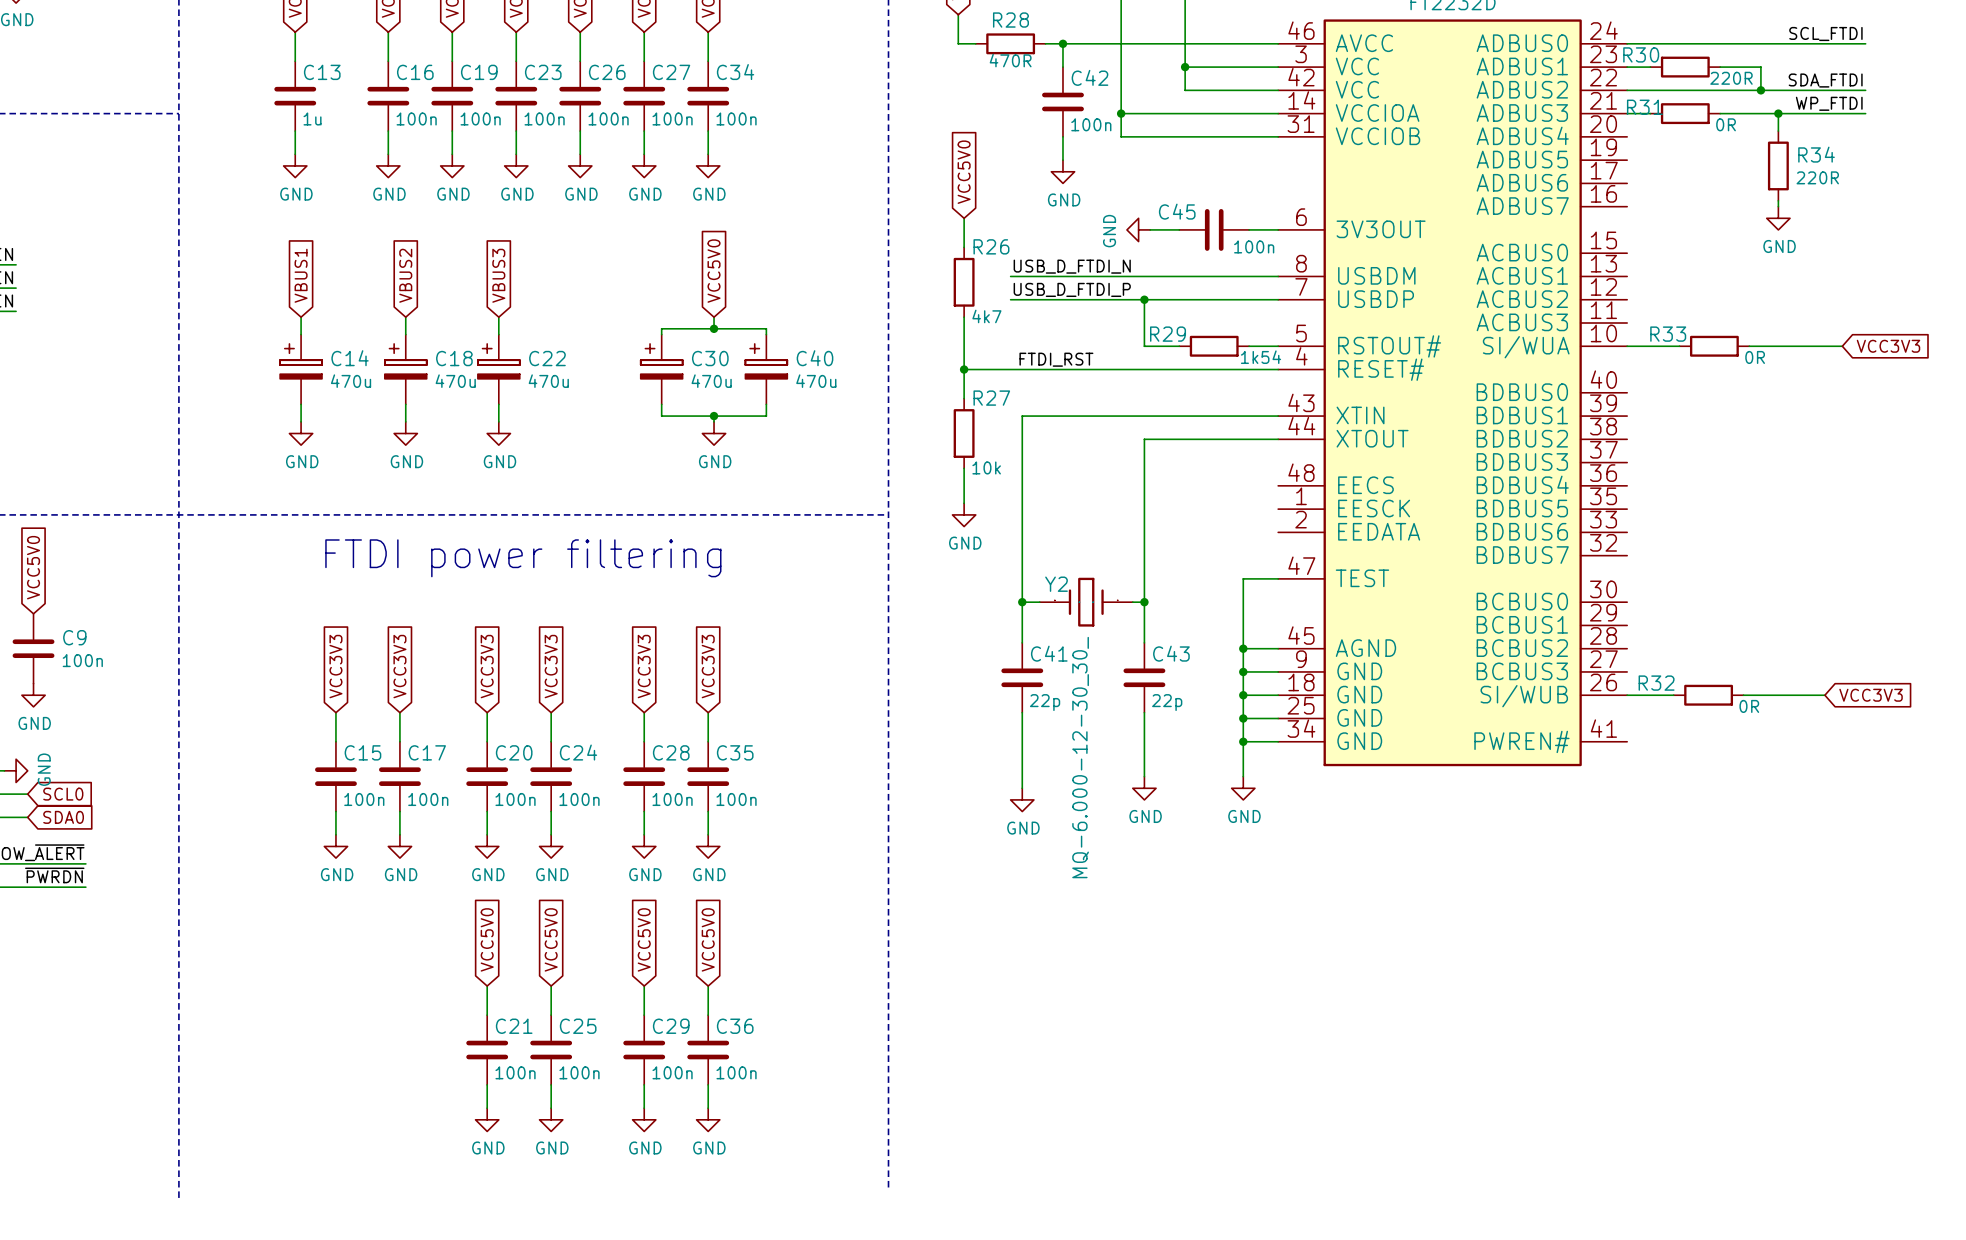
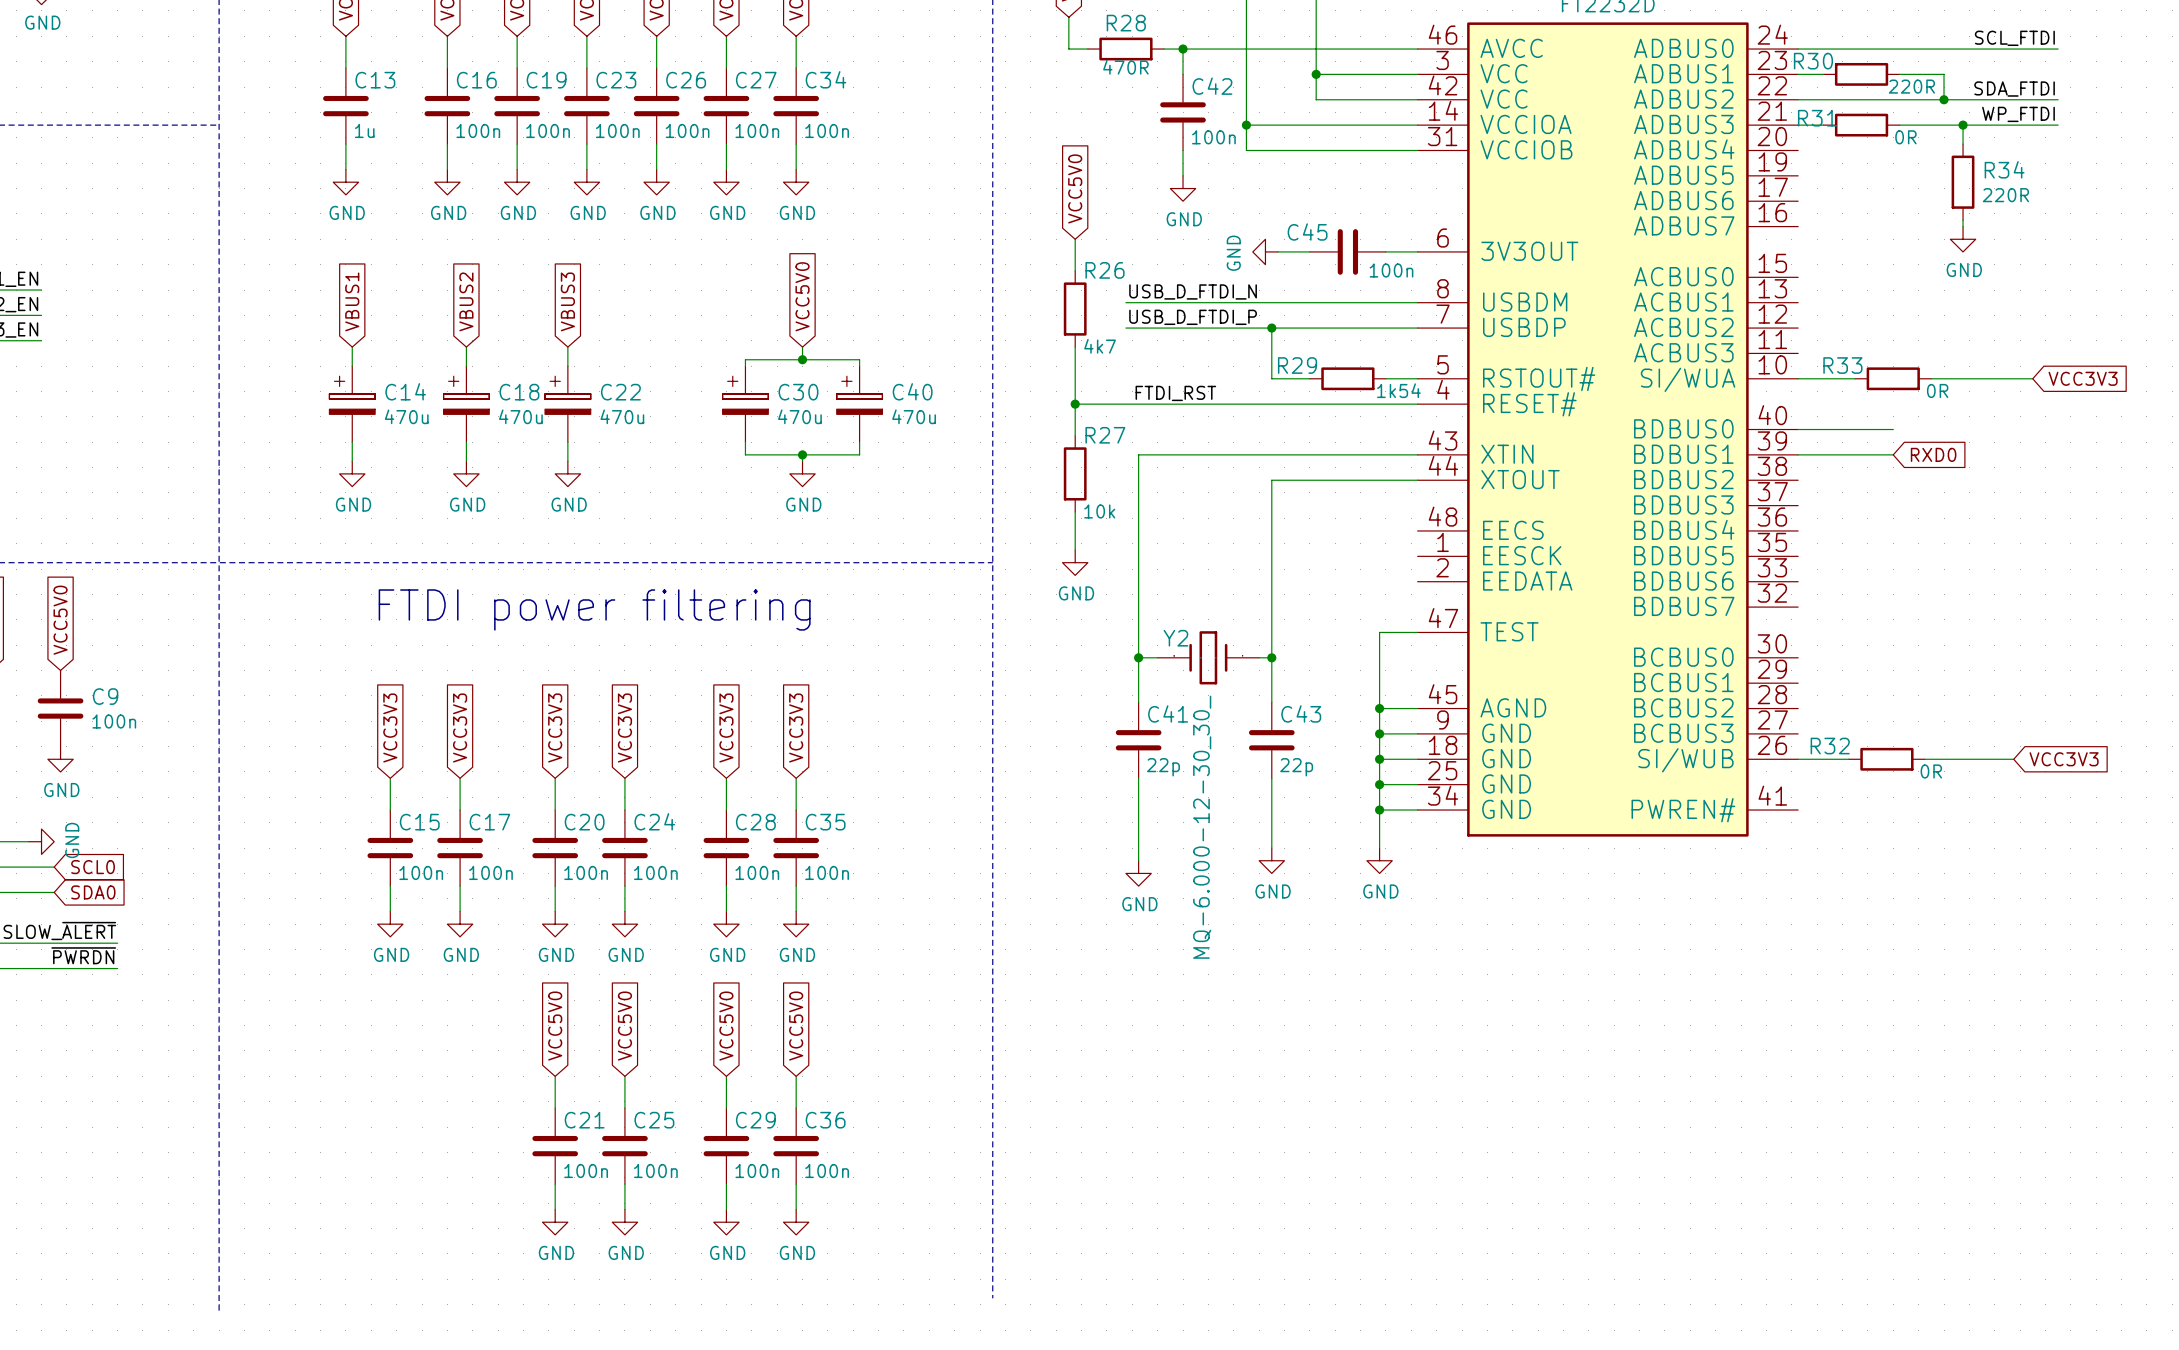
wire: none -> (1798, 429) (1893, 429)
wire: none -> (1798, 454) (1893, 454)
global label: none -> RXD0 (1933, 454)

